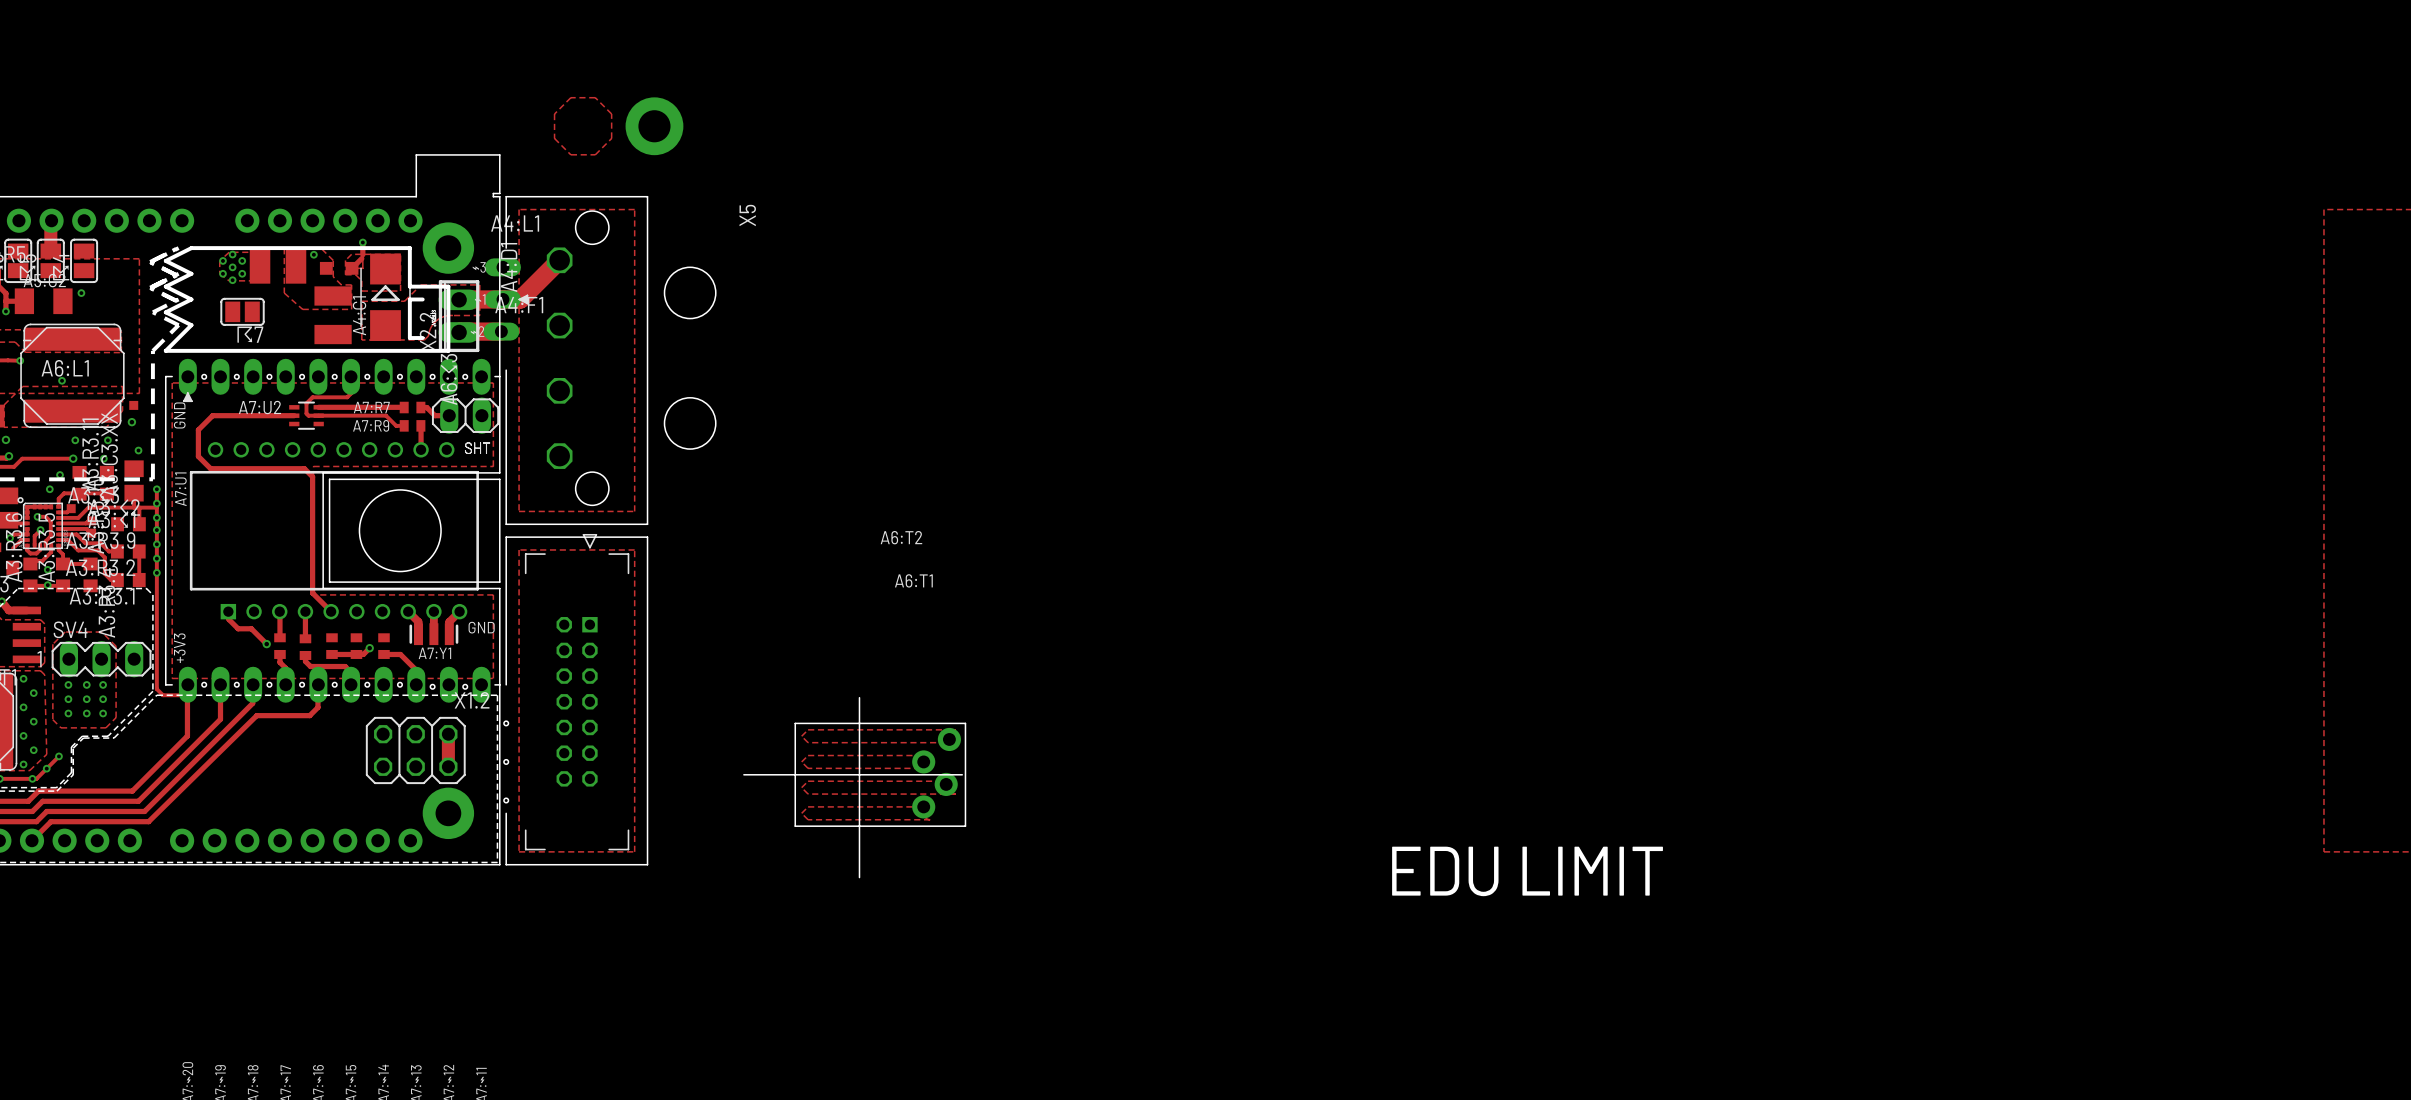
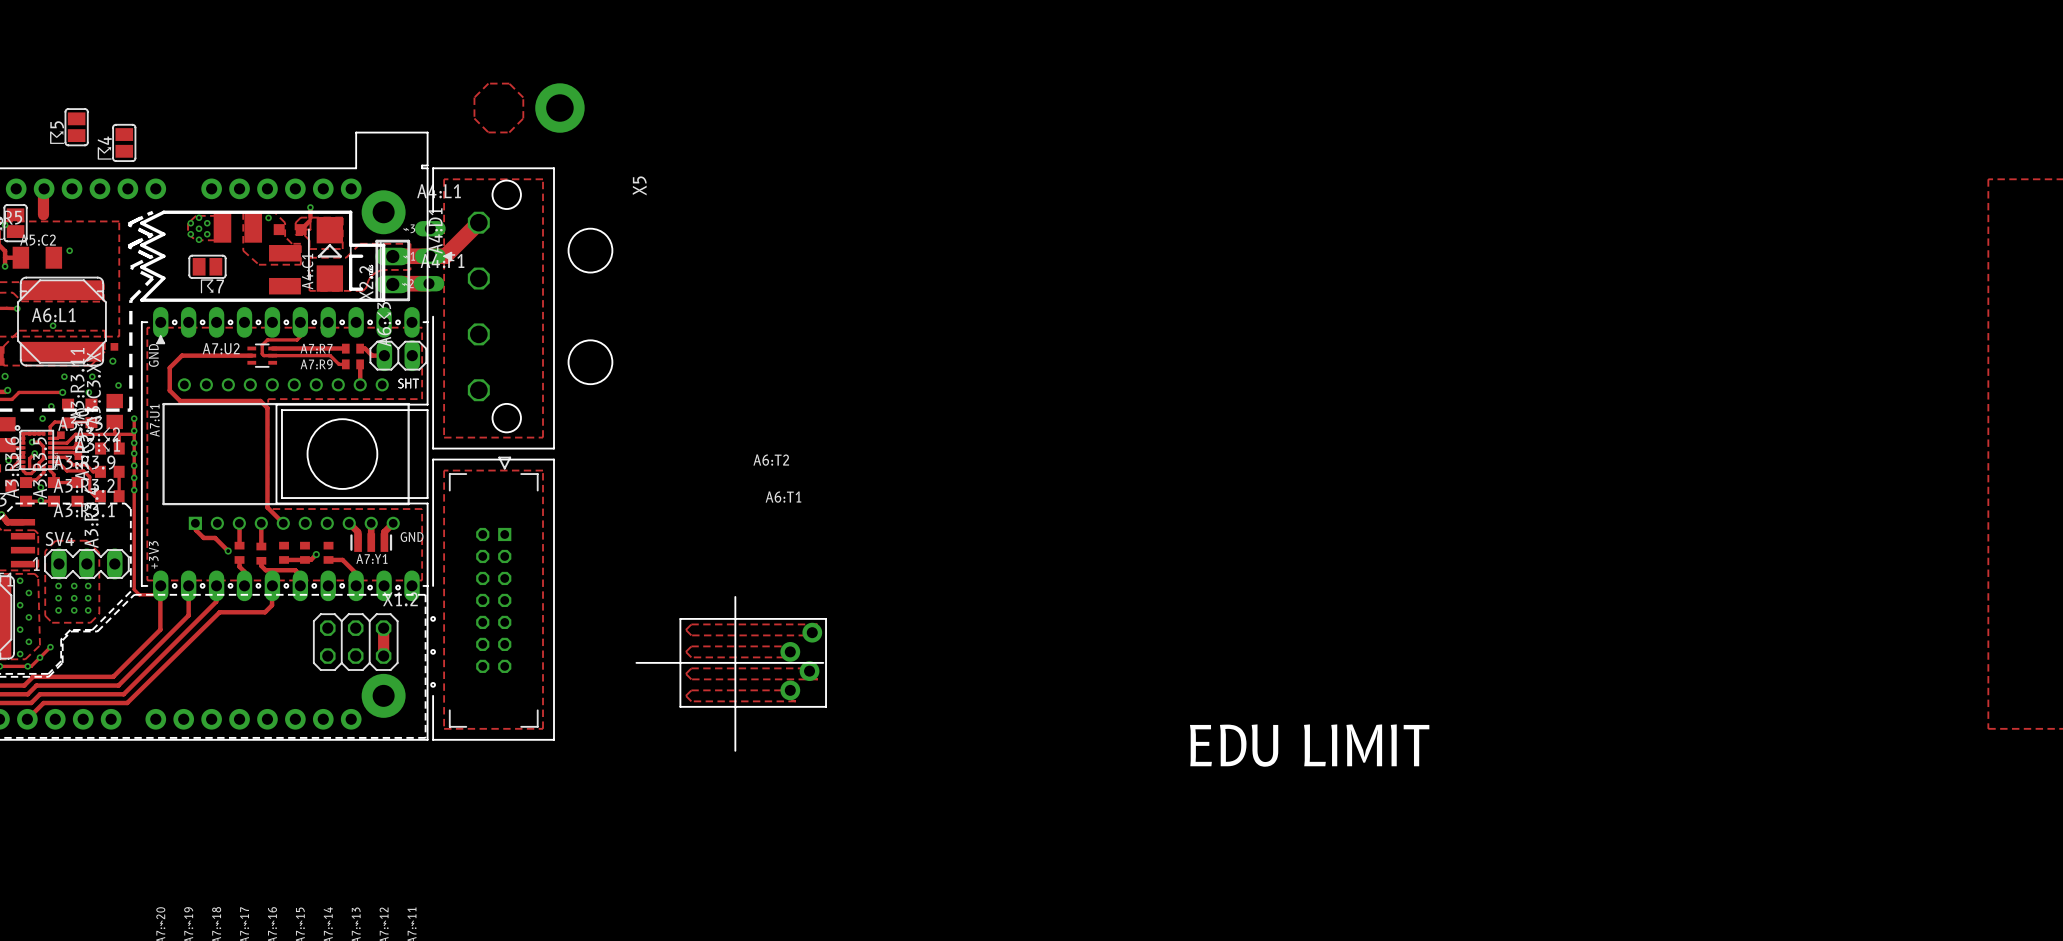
☈5 position: (50, 260) -> (76, 127)
☈4 position: (84, 260) -> (124, 142)
via: none -> (5, 224)

